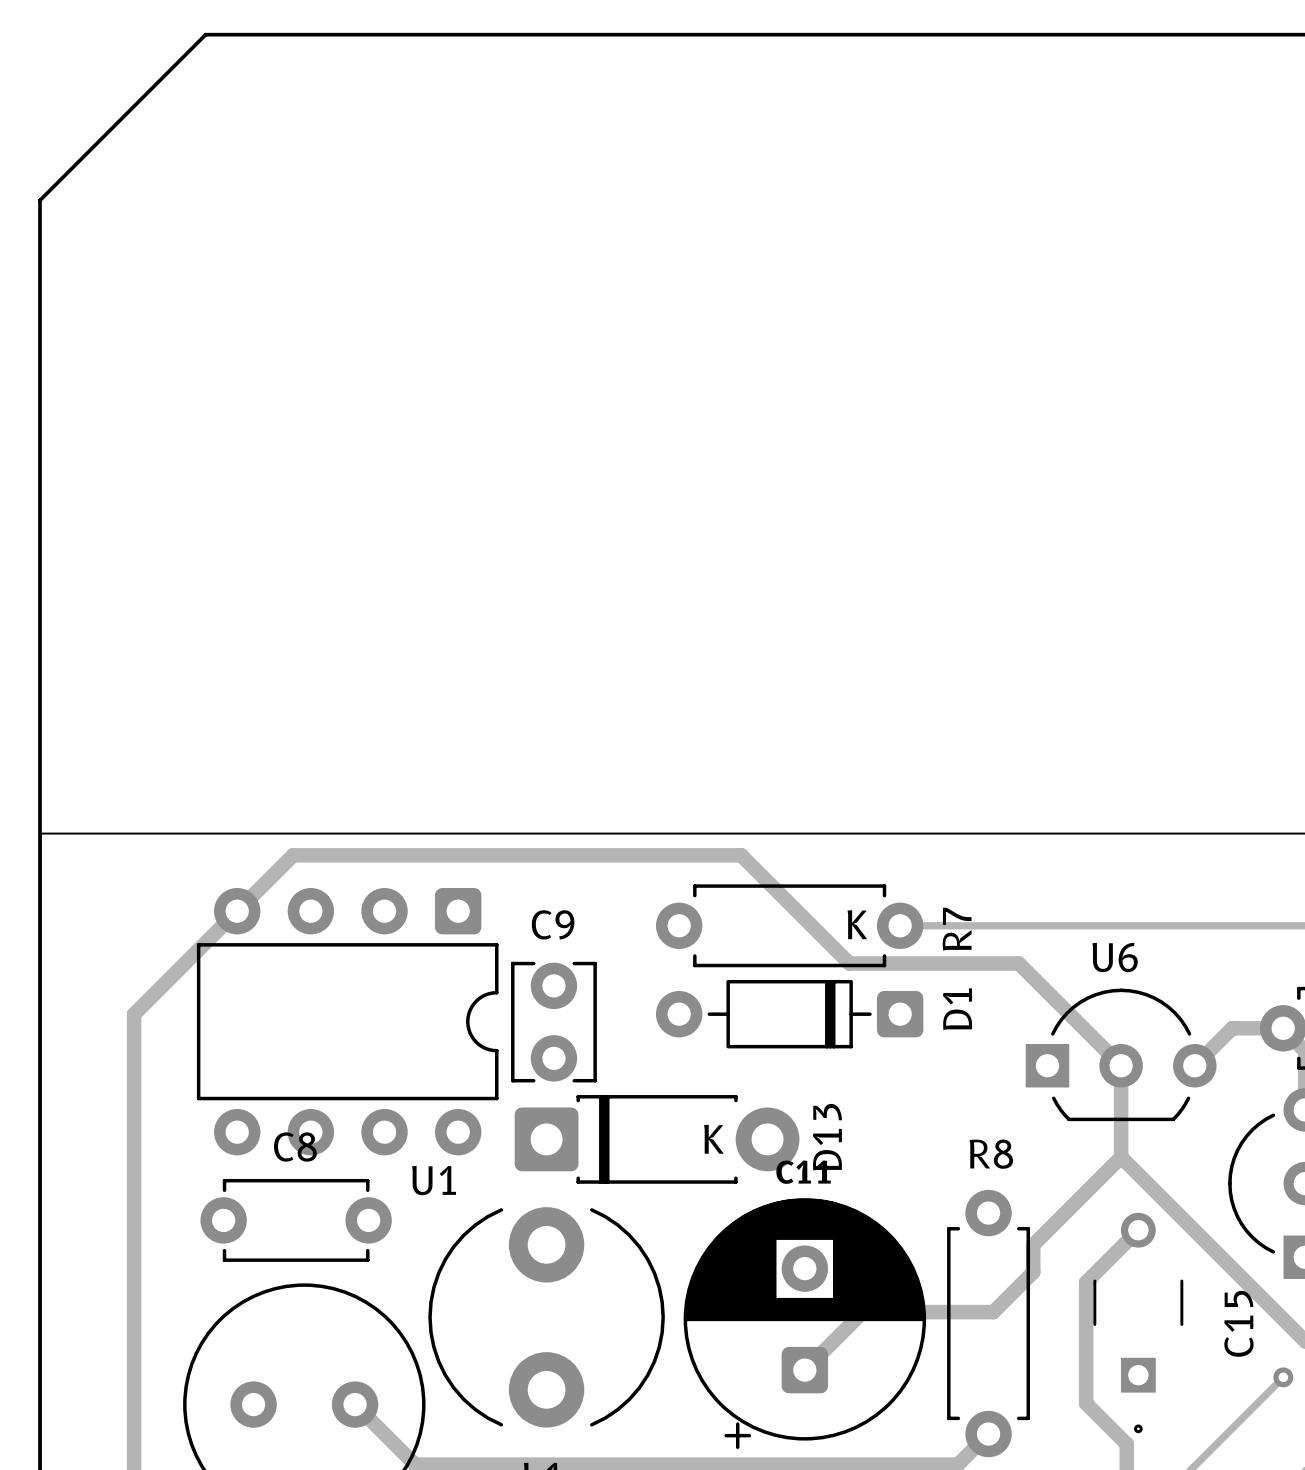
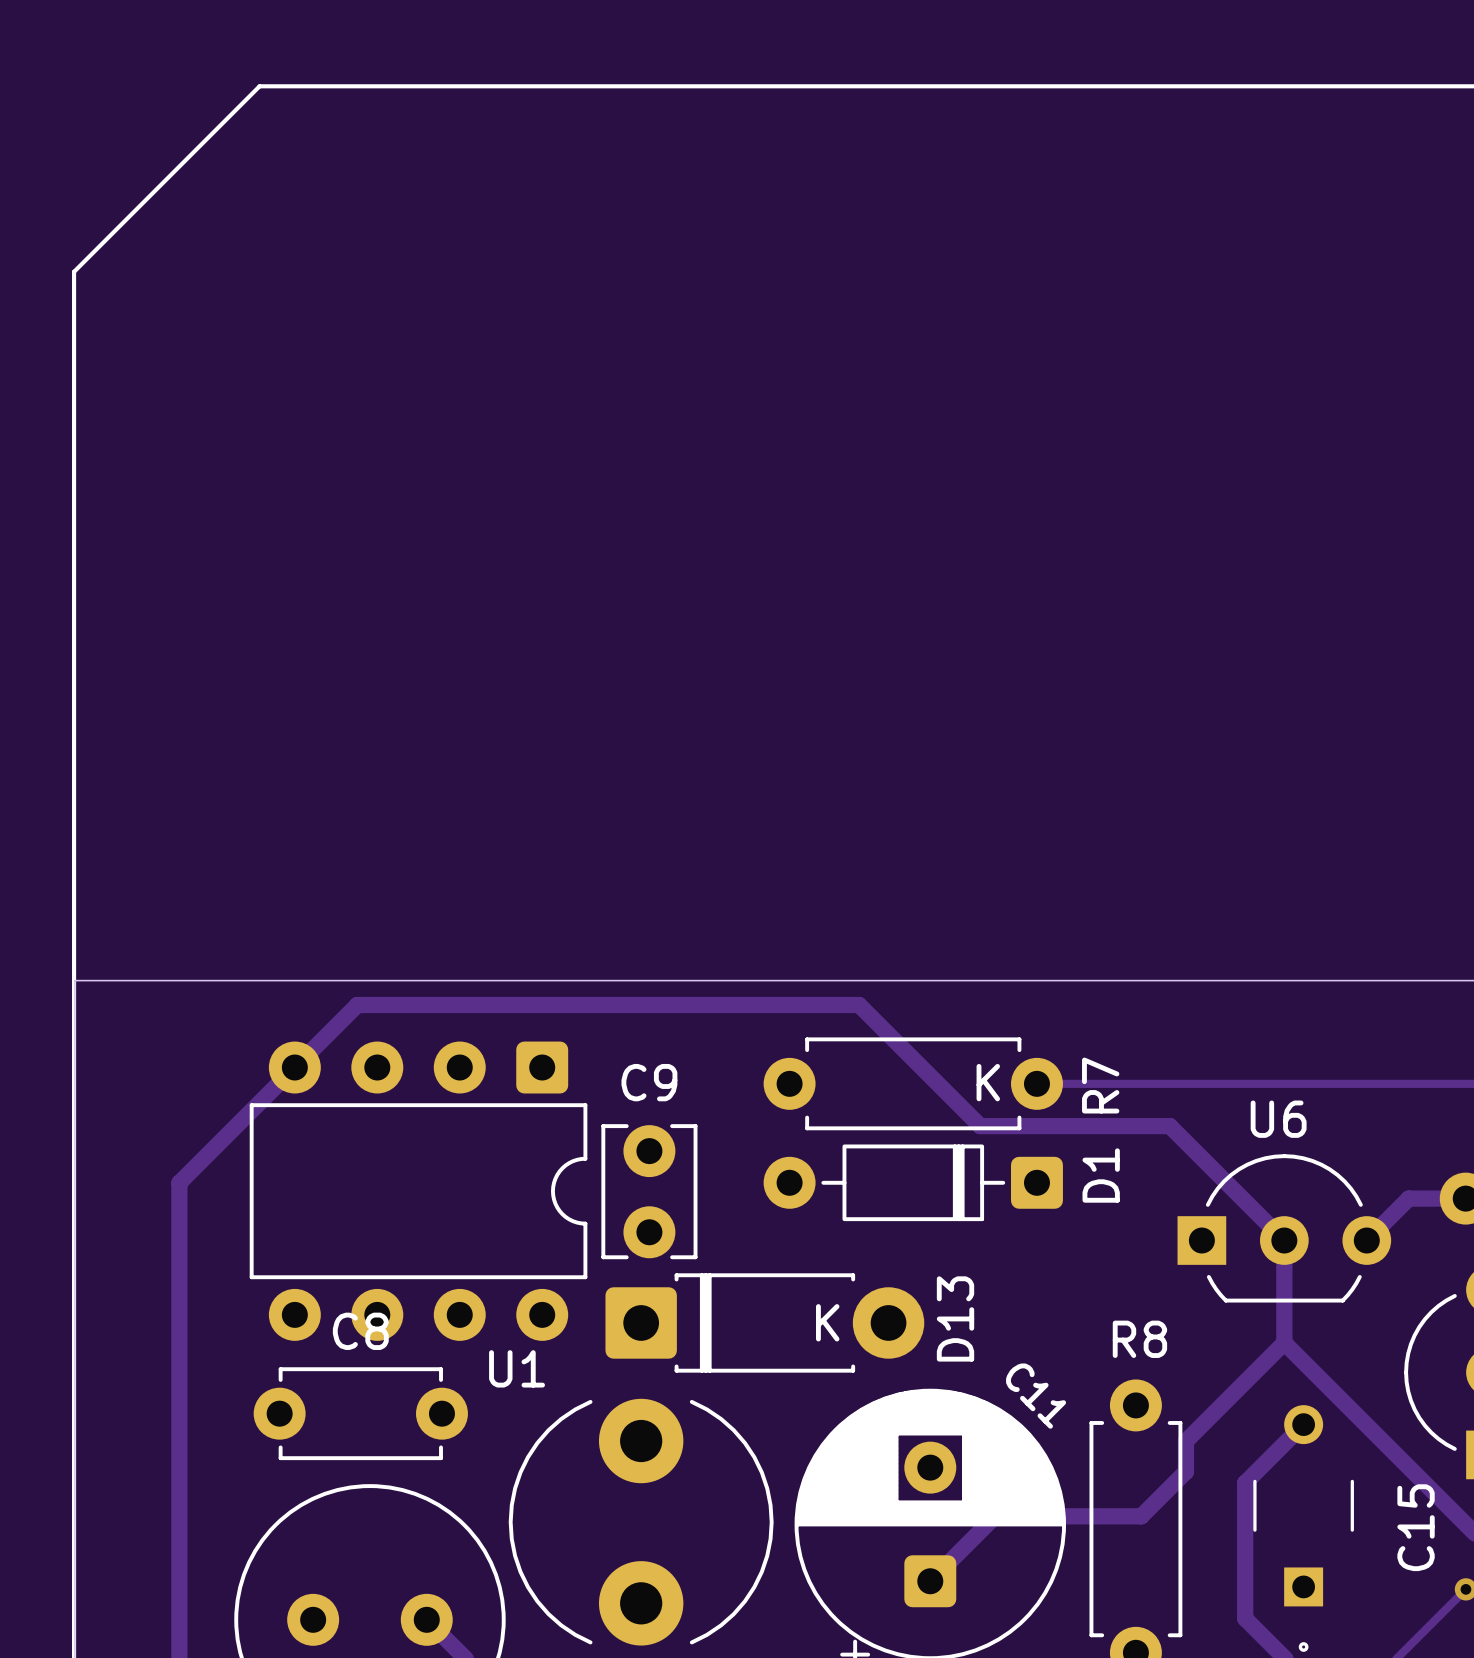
C11 name rotation: 0° (803, 1172) -> 45° clockwise (1036, 1396)
C11 name position: C11 (803, 1172) -> C11 (1036, 1396)

